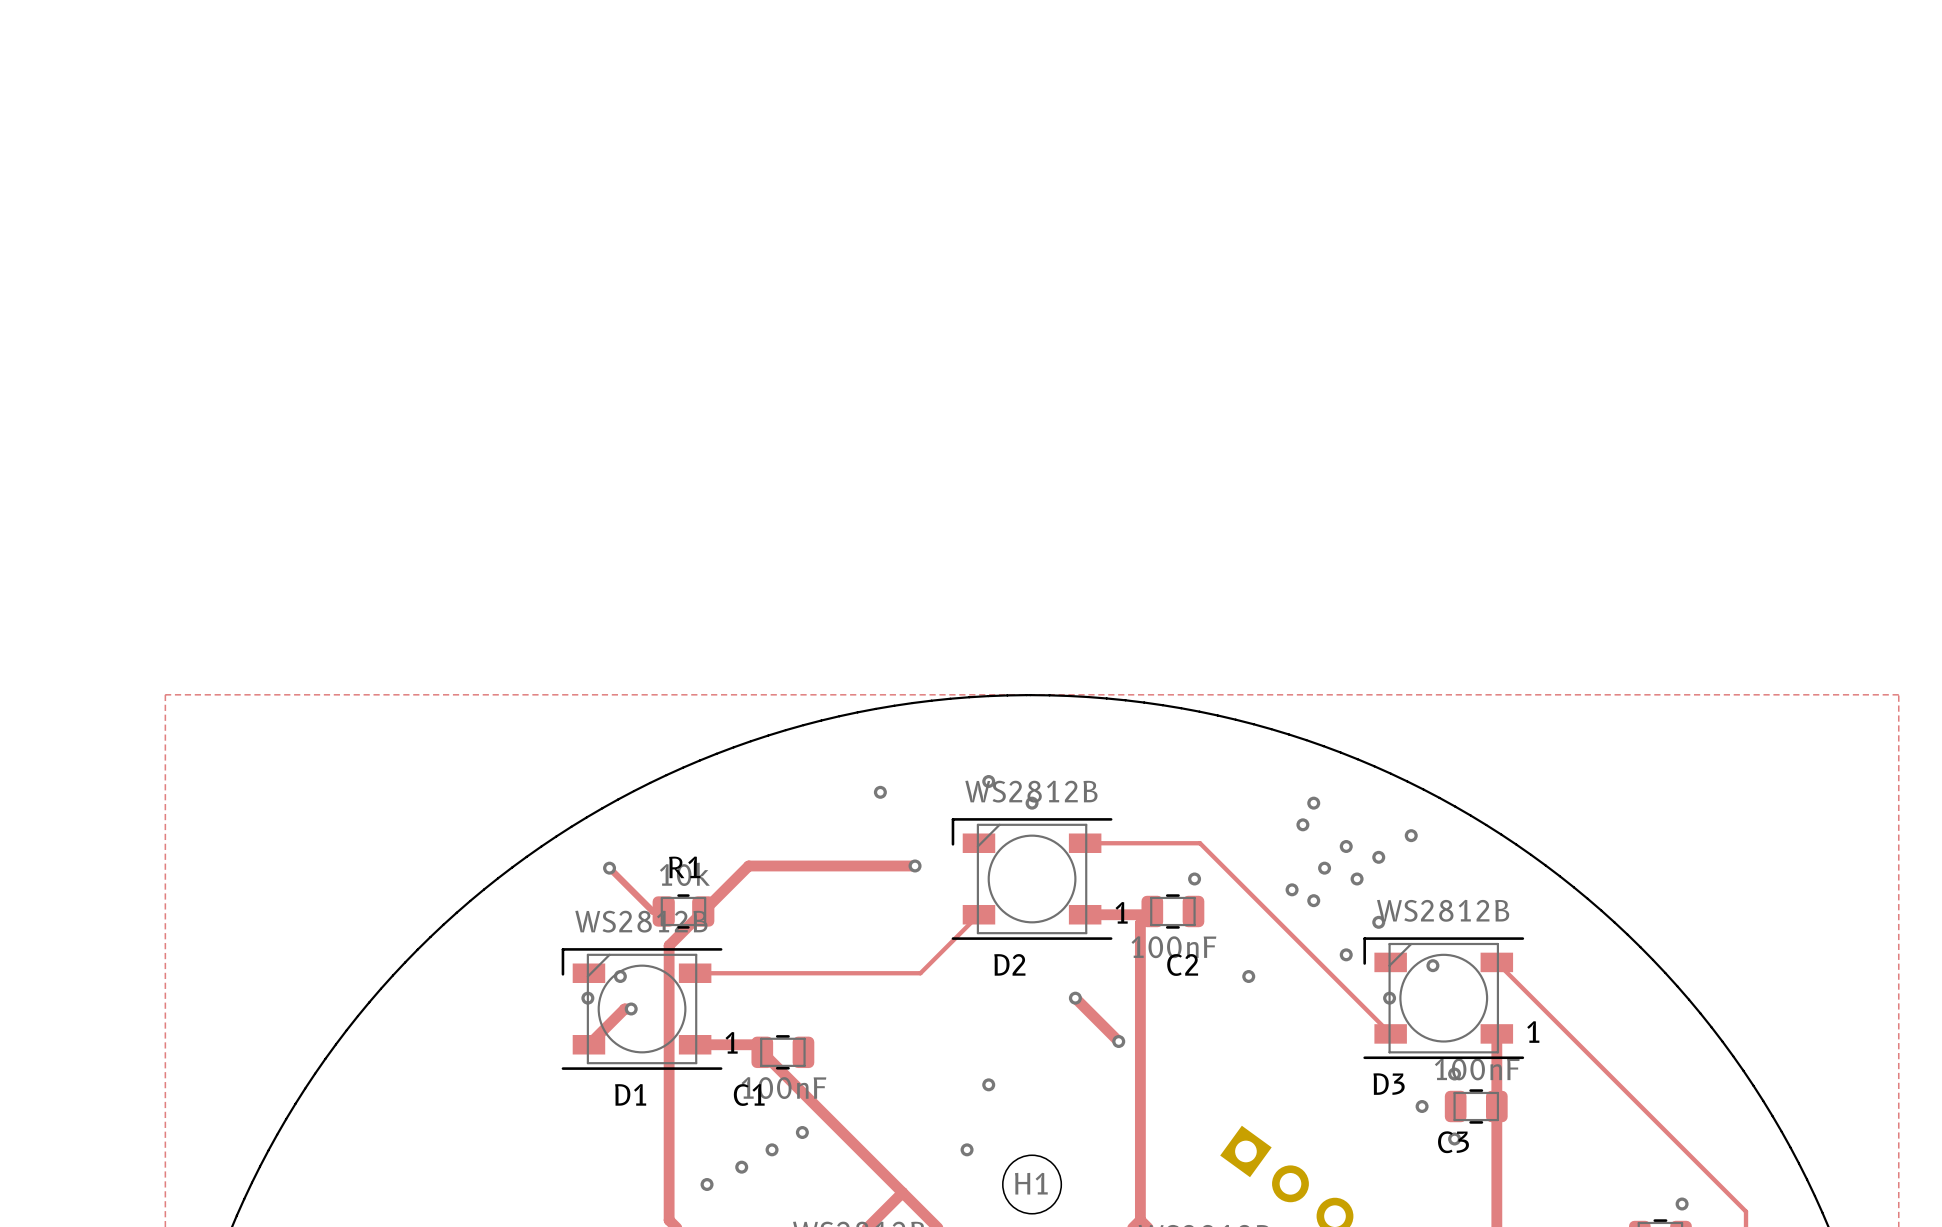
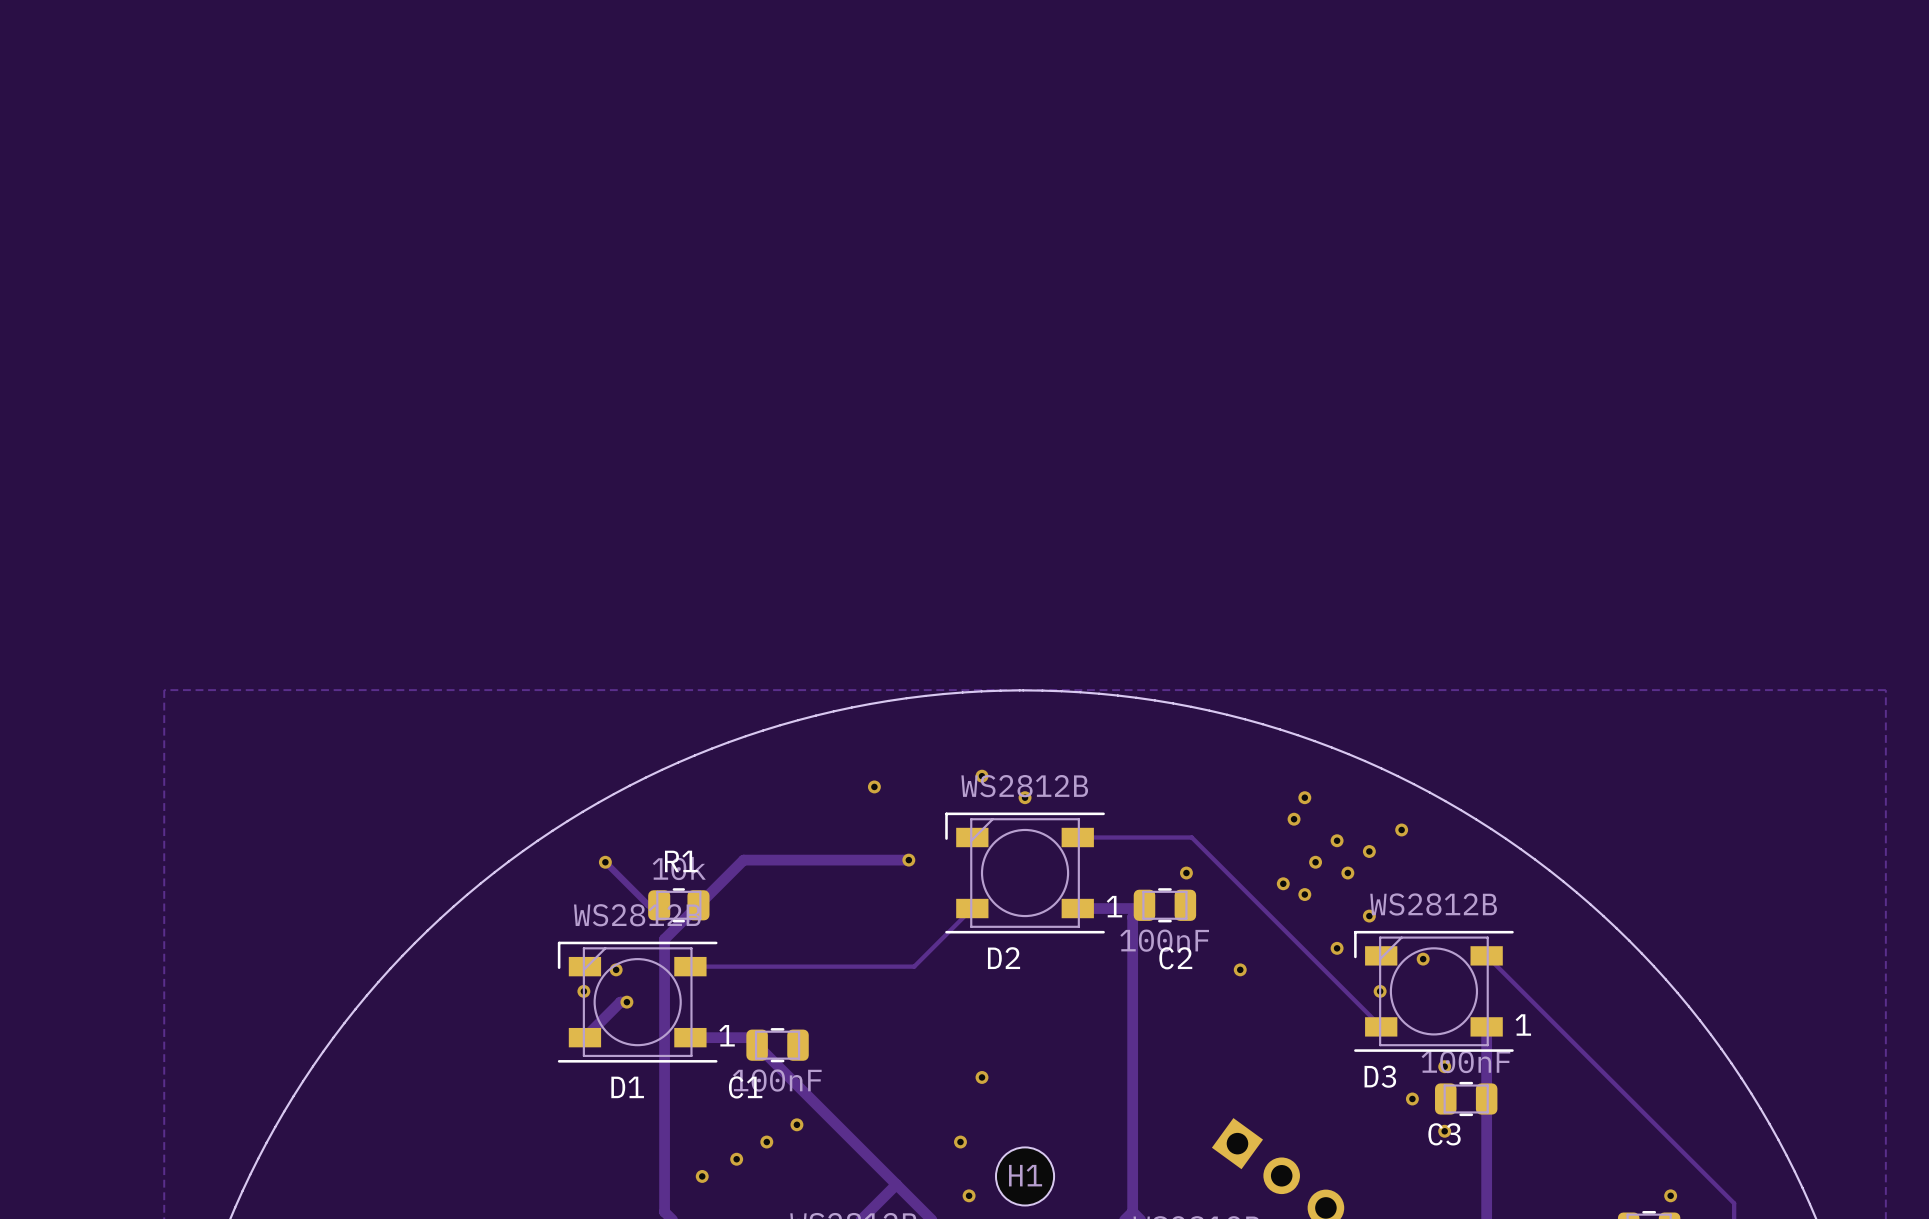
track: (1075, 998) (1118, 1041) -> none
via: (1075, 998) -> none
via: (1118, 1041) -> none
via: none -> (969, 1195)

